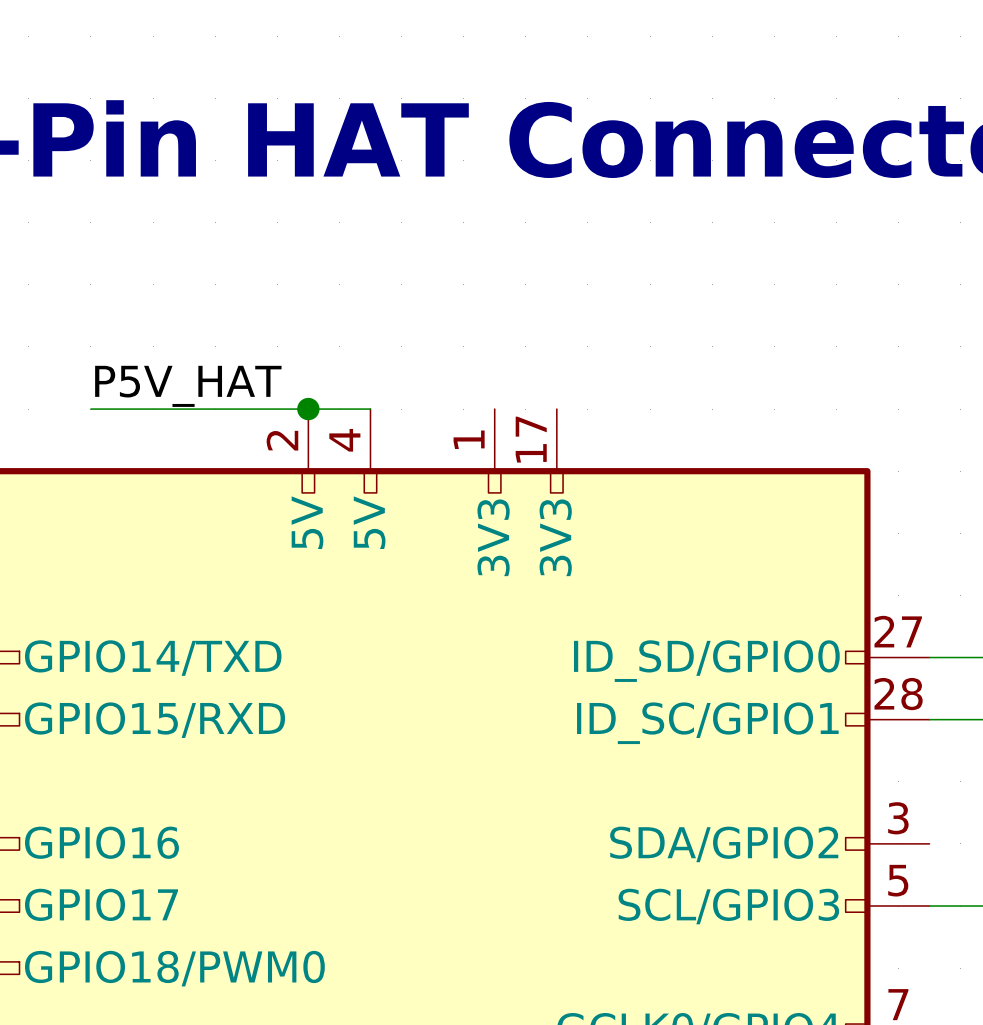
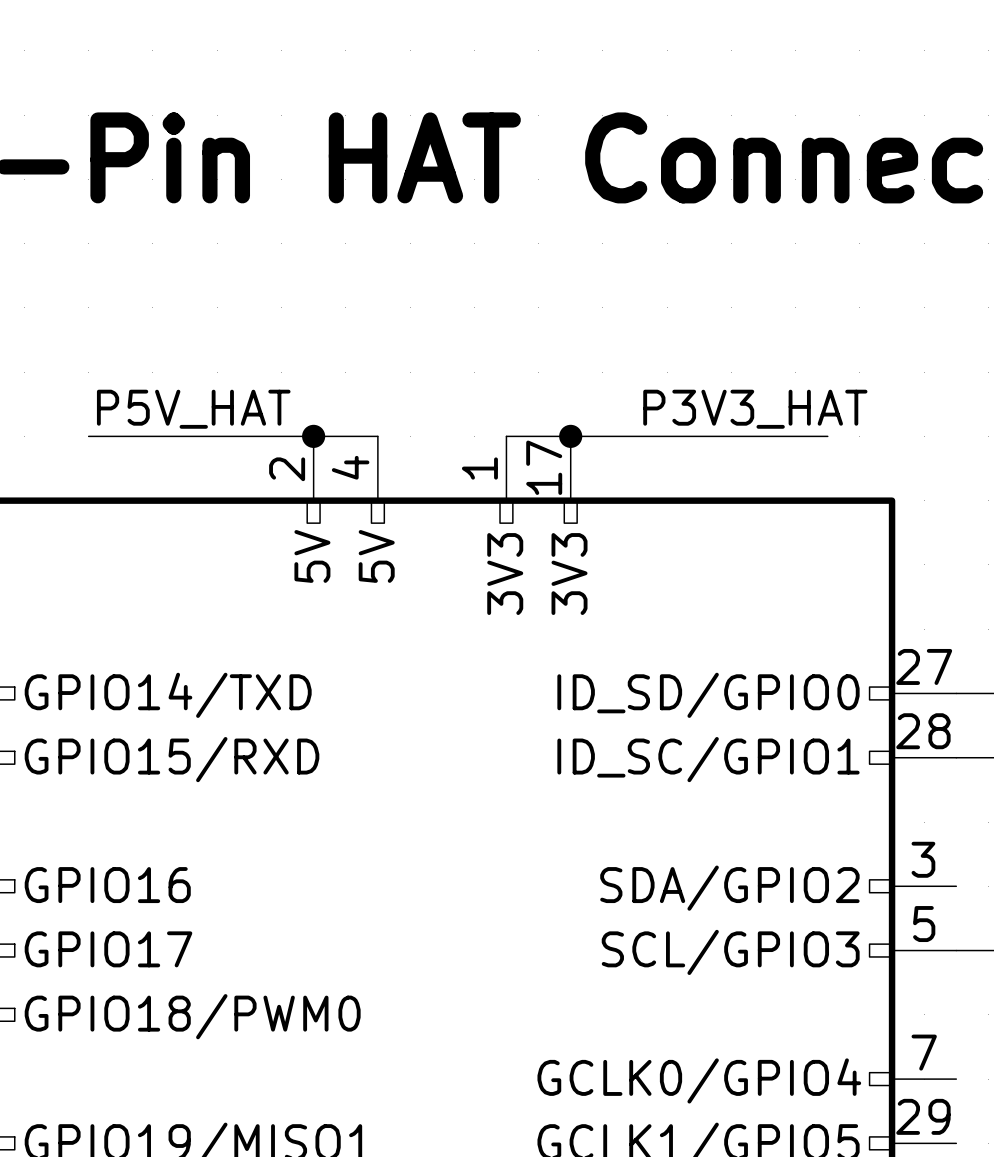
label: none -> P3V3_HAT (755, 409)
wire: none -> (506, 436) (827, 436)
junction: none -> (570, 436)

